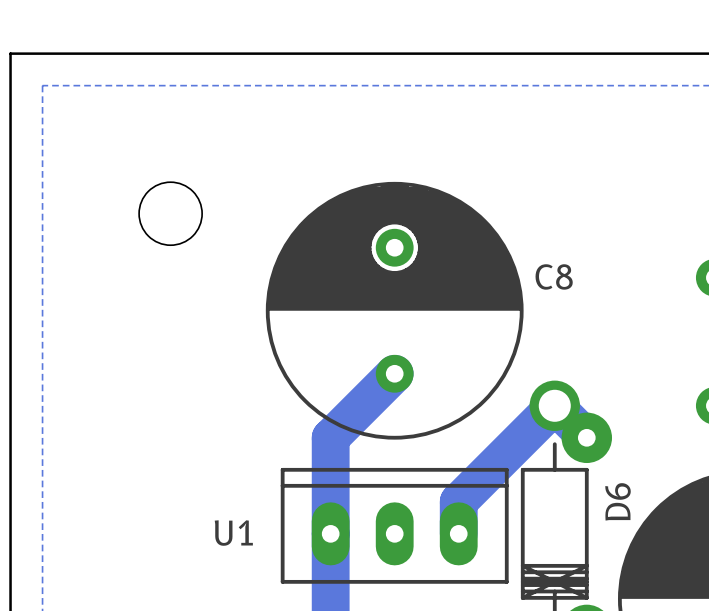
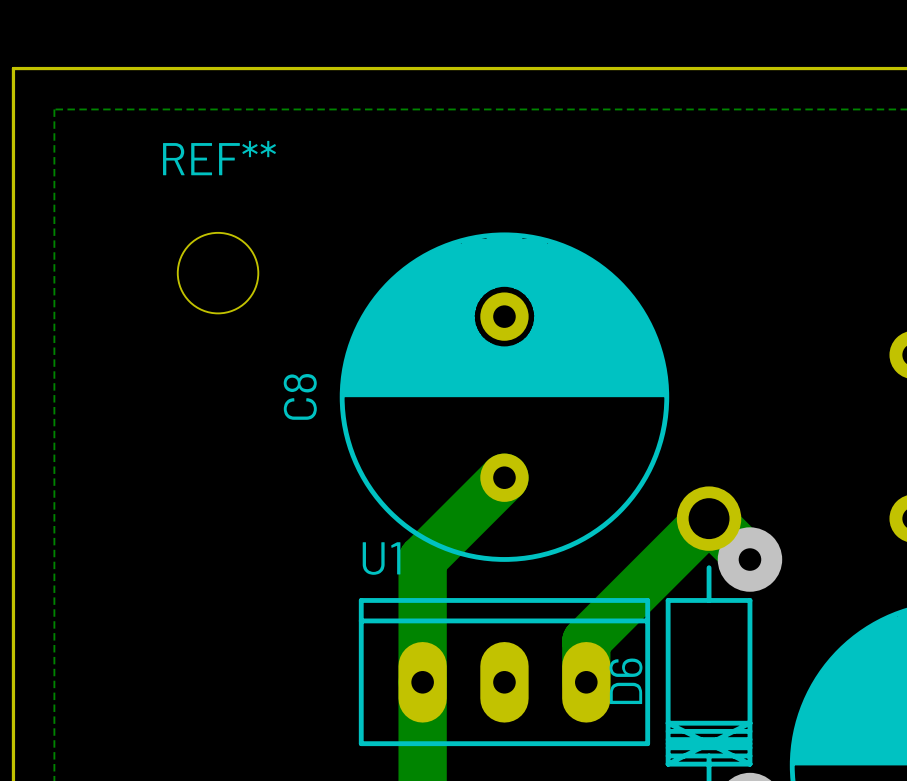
REF** name: none -> REF** (219, 158)
C8 name rotation: 0° (554, 276) -> 90° counterclockwise (300, 396)
C8 name position: C8 (554, 276) -> C8 (300, 396)
D6 name position: D6 (618, 501) -> D6 (625, 681)
U1 name position: U1 (233, 533) -> U1 (381, 558)

